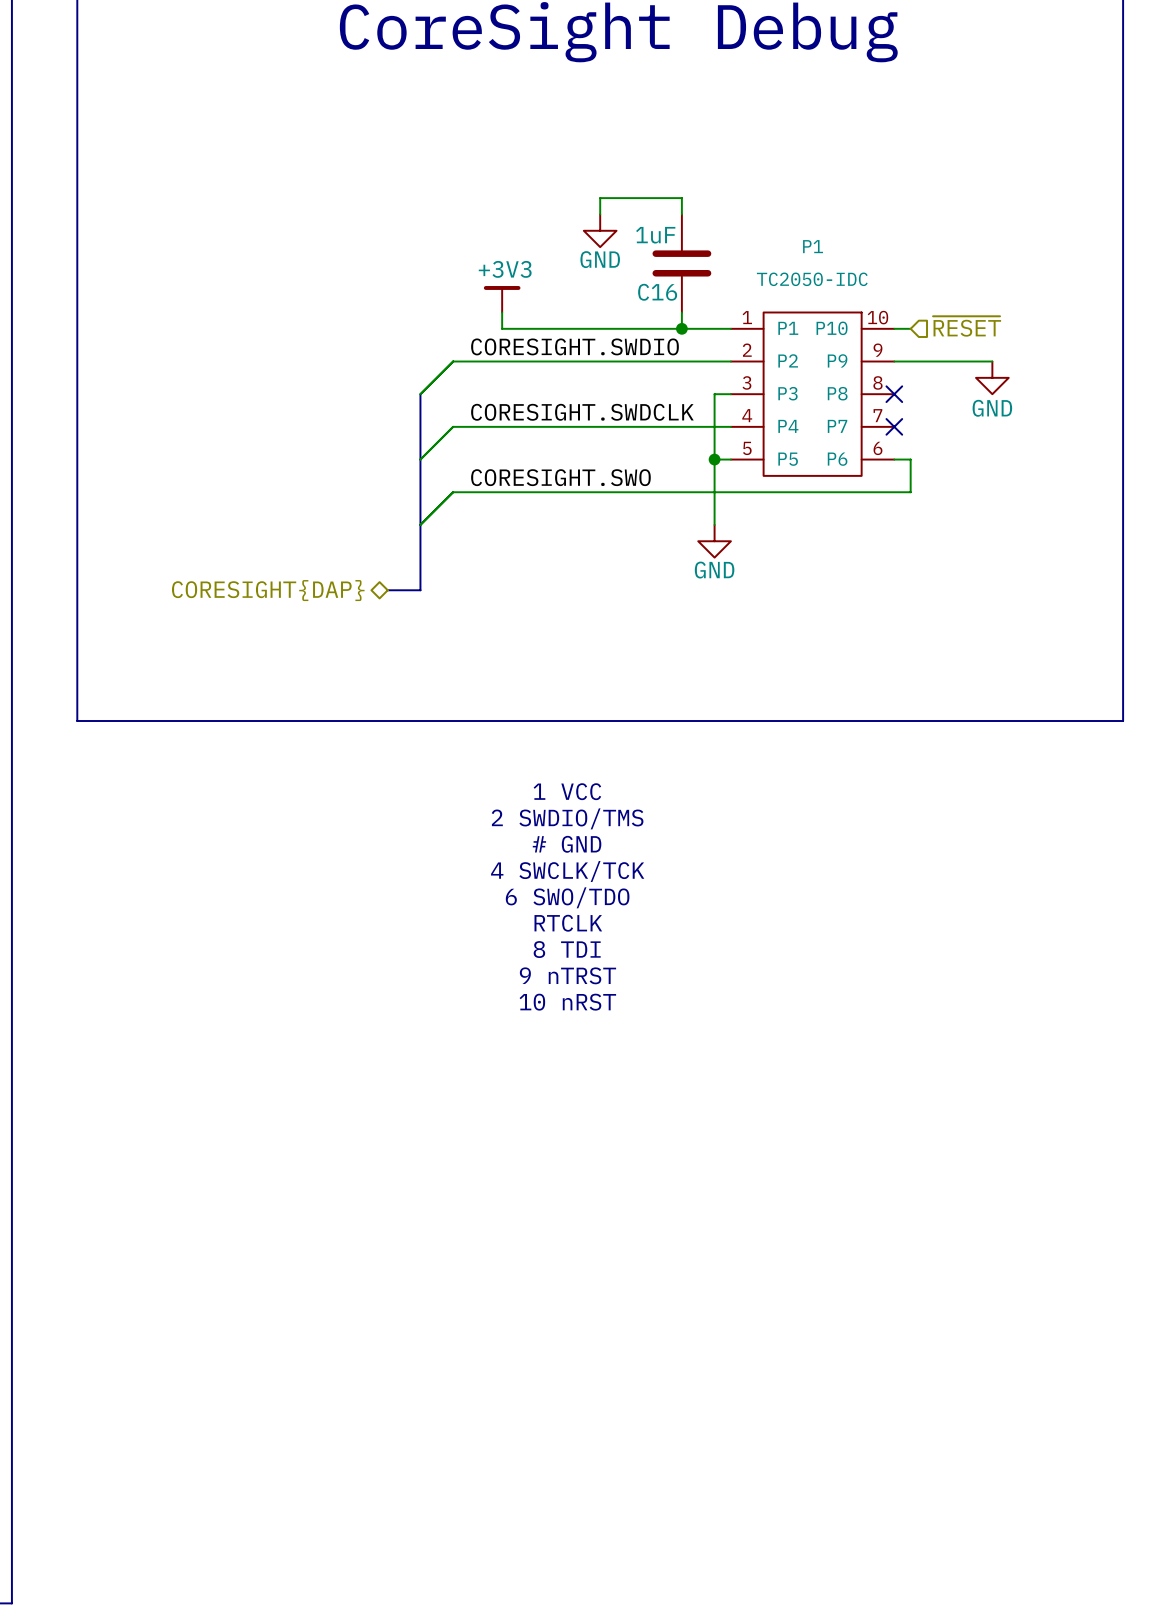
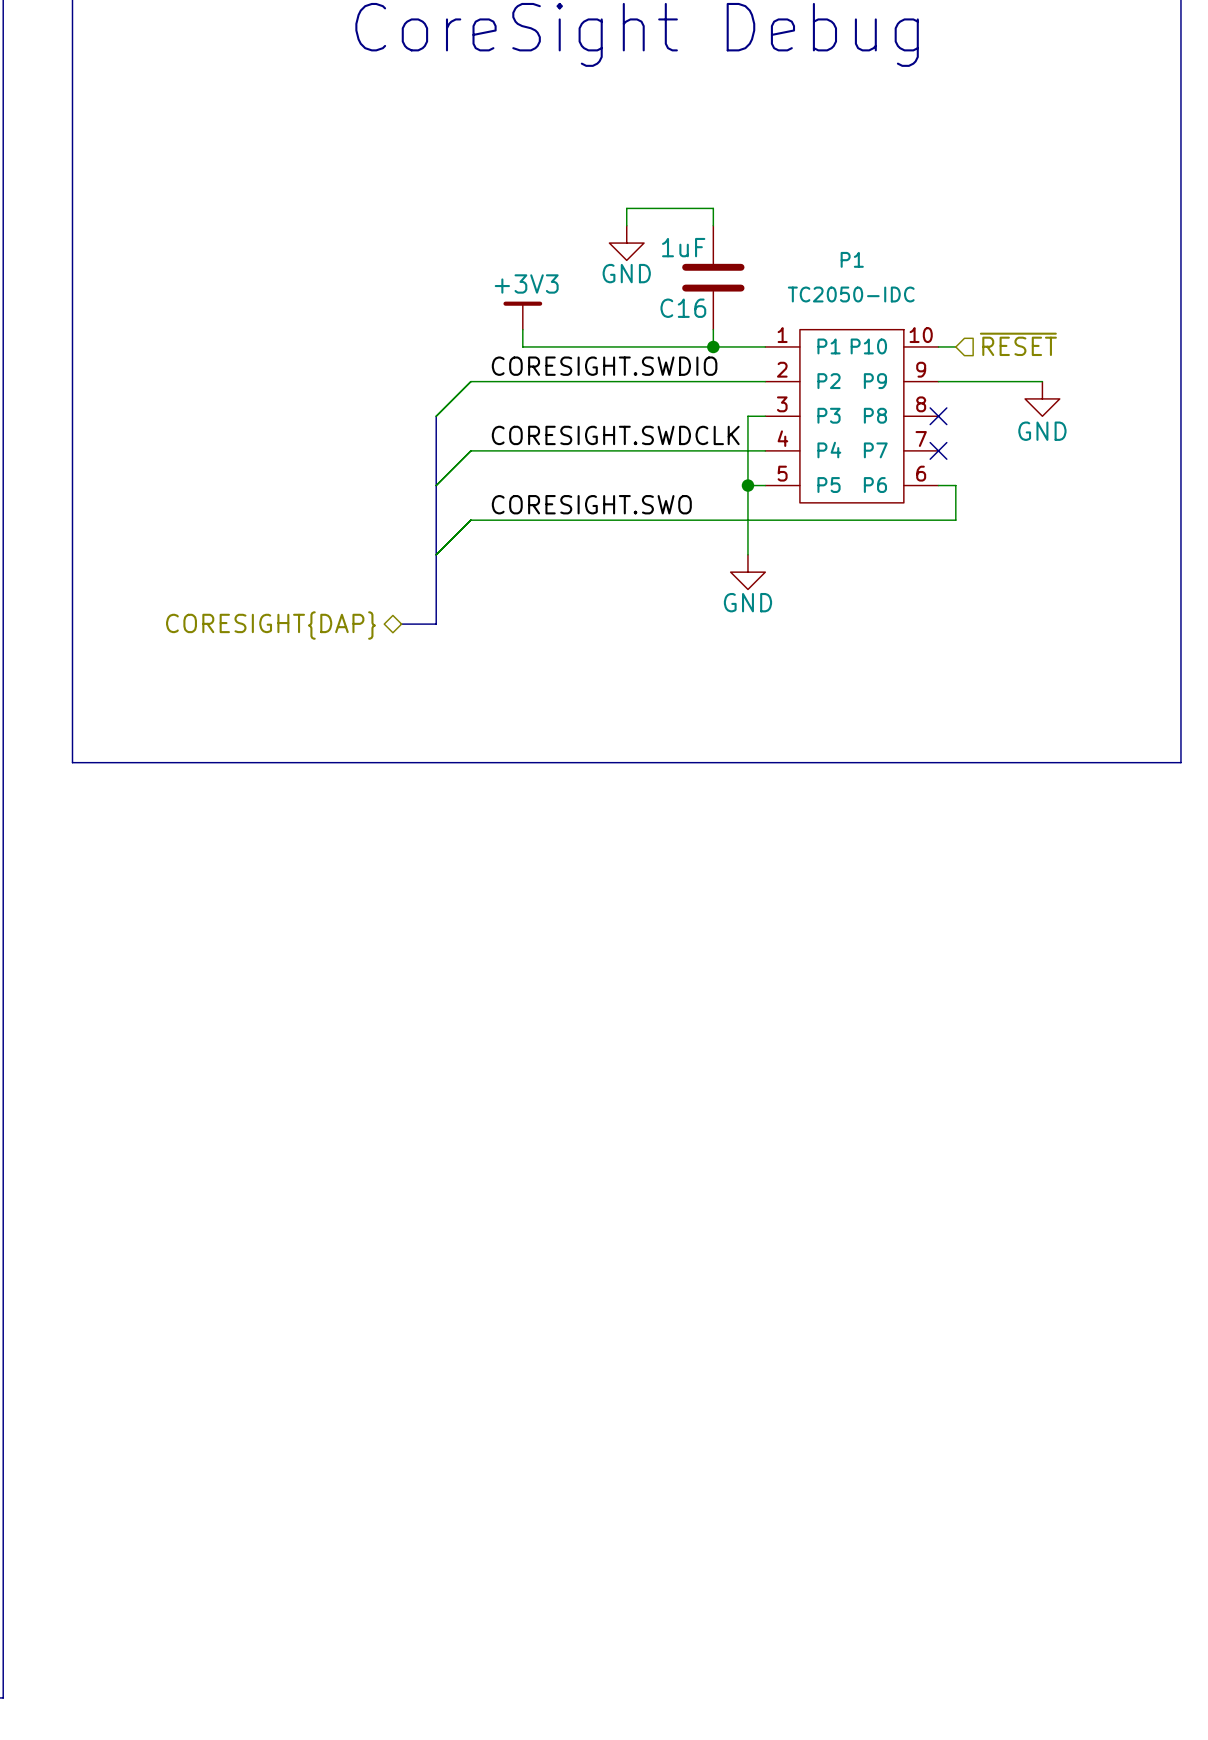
text: 1 VCC (567, 791) -> none
text: 2 SWDIO/TMS (567, 818) -> none
text: # GND (567, 844) -> none
text: 4 SWCLK/TCK (567, 871) -> none
text: 6 SWO/TDO (567, 897) -> none
text: RTCLK (568, 923) -> none
text: 8 TDI (567, 949) -> none
text: 9 nTRST (567, 975) -> none
text: 10 nRST (567, 1002) -> none

